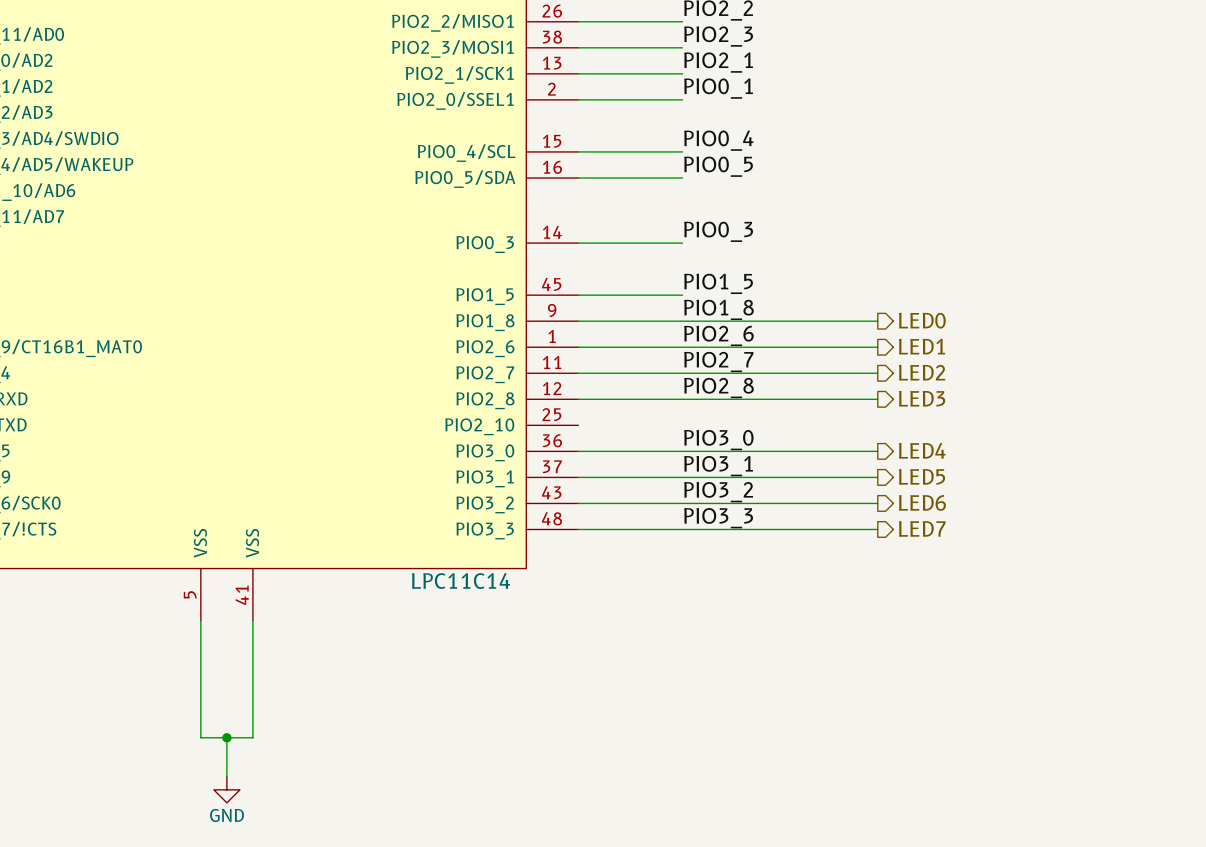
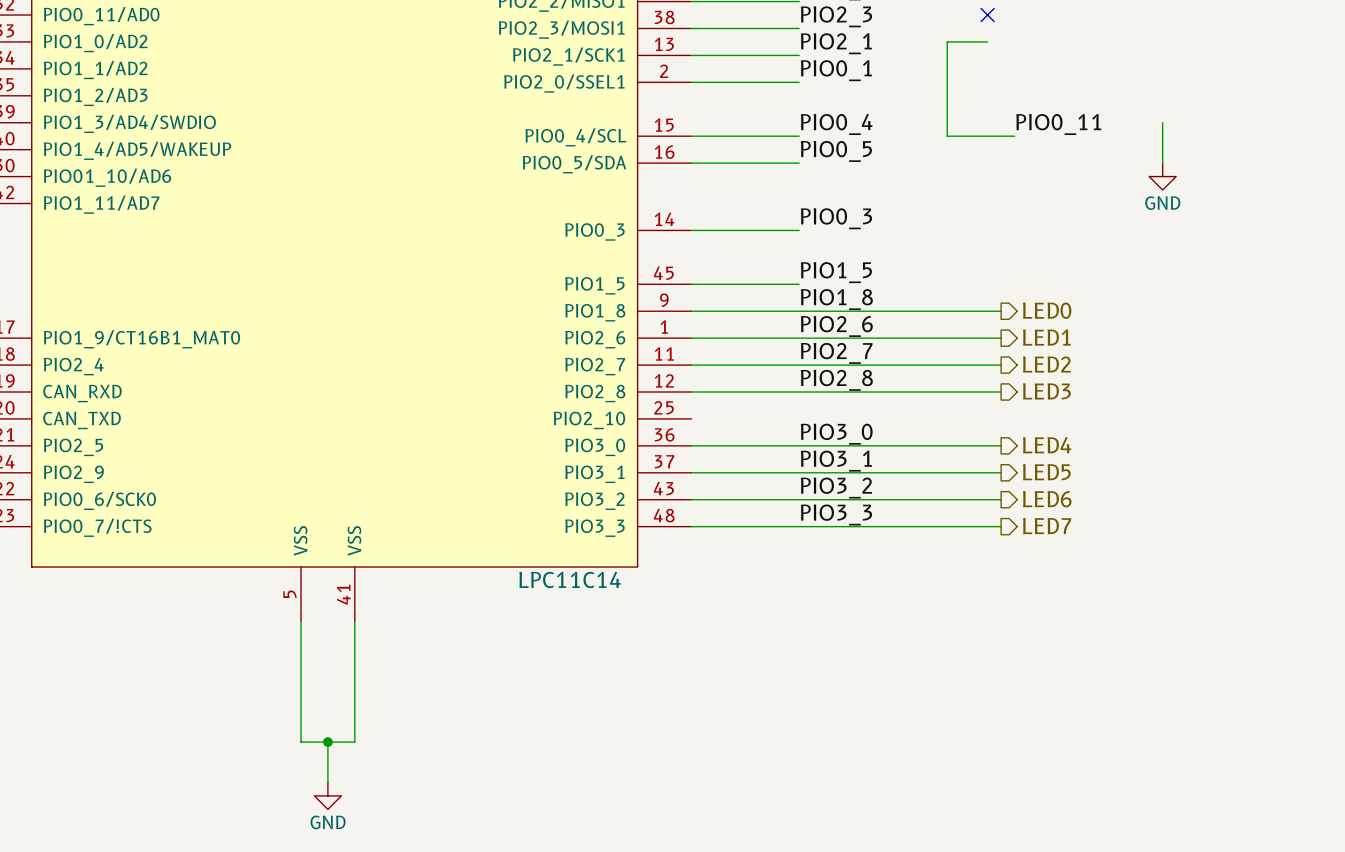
no-connect mark: none -> (987, 15)
wire: none -> (987, 41) (947, 41) (947, 136) (1014, 136)
wire: none -> (1162, 122) (1162, 163)
label: none -> PIO0_11 (1058, 124)
power symbol: none -> GND (1162, 176)

